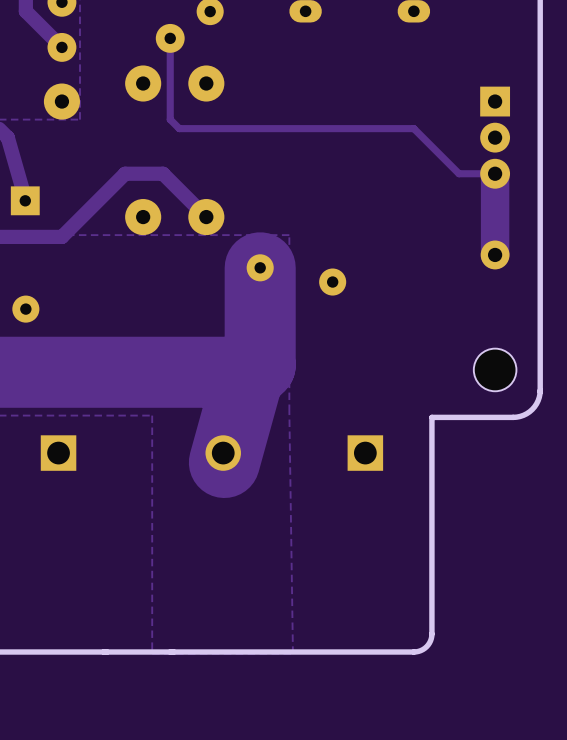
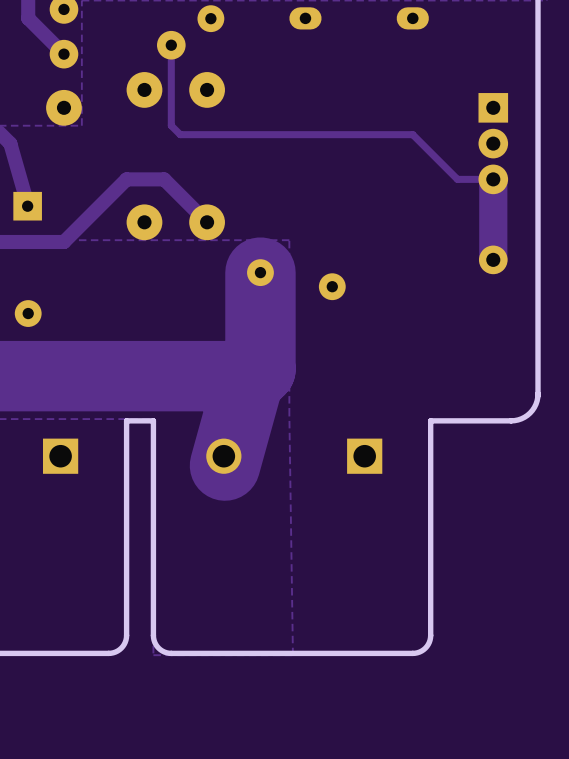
part: (495, 369) -> none
board edge: none -> (126, 635) (121, 648) (108, 653)
board edge: (170, 652) (107, 652) -> (171, 653) (158, 648) (153, 637) (153, 420) (126, 420) (126, 635)

